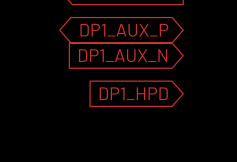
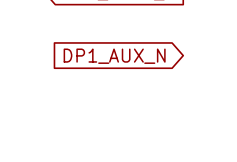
global label: DP1_AUX_P (124, 30) -> none
global label: DP1_HPD (133, 93) -> none

